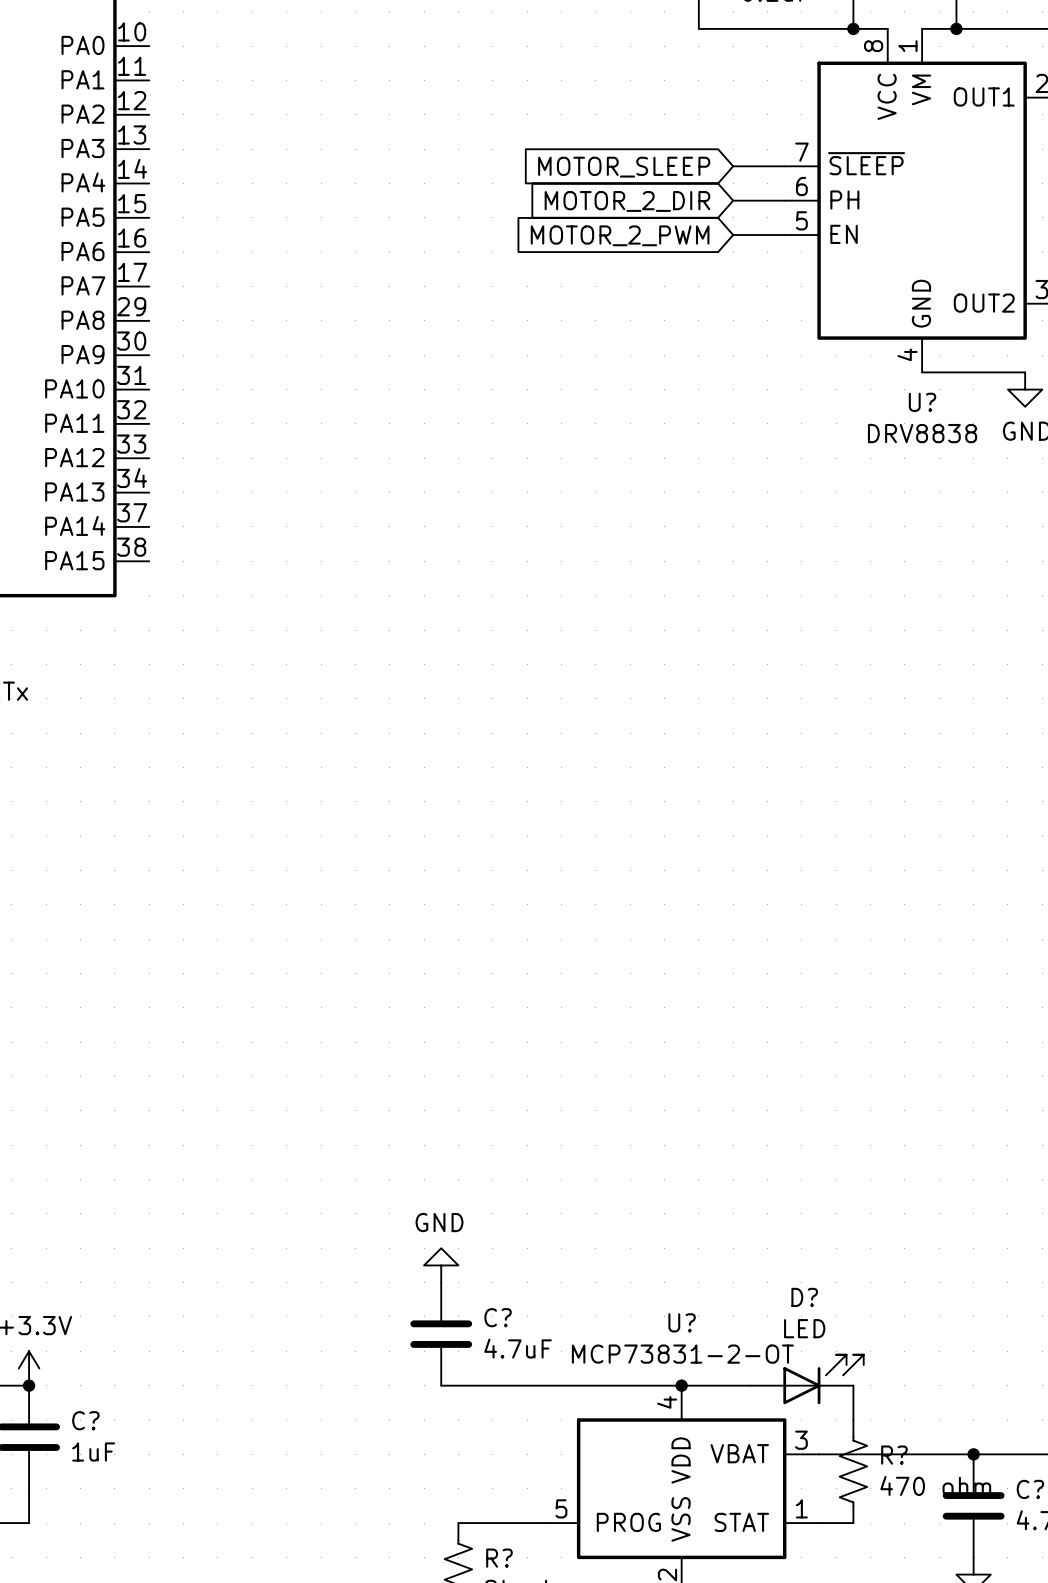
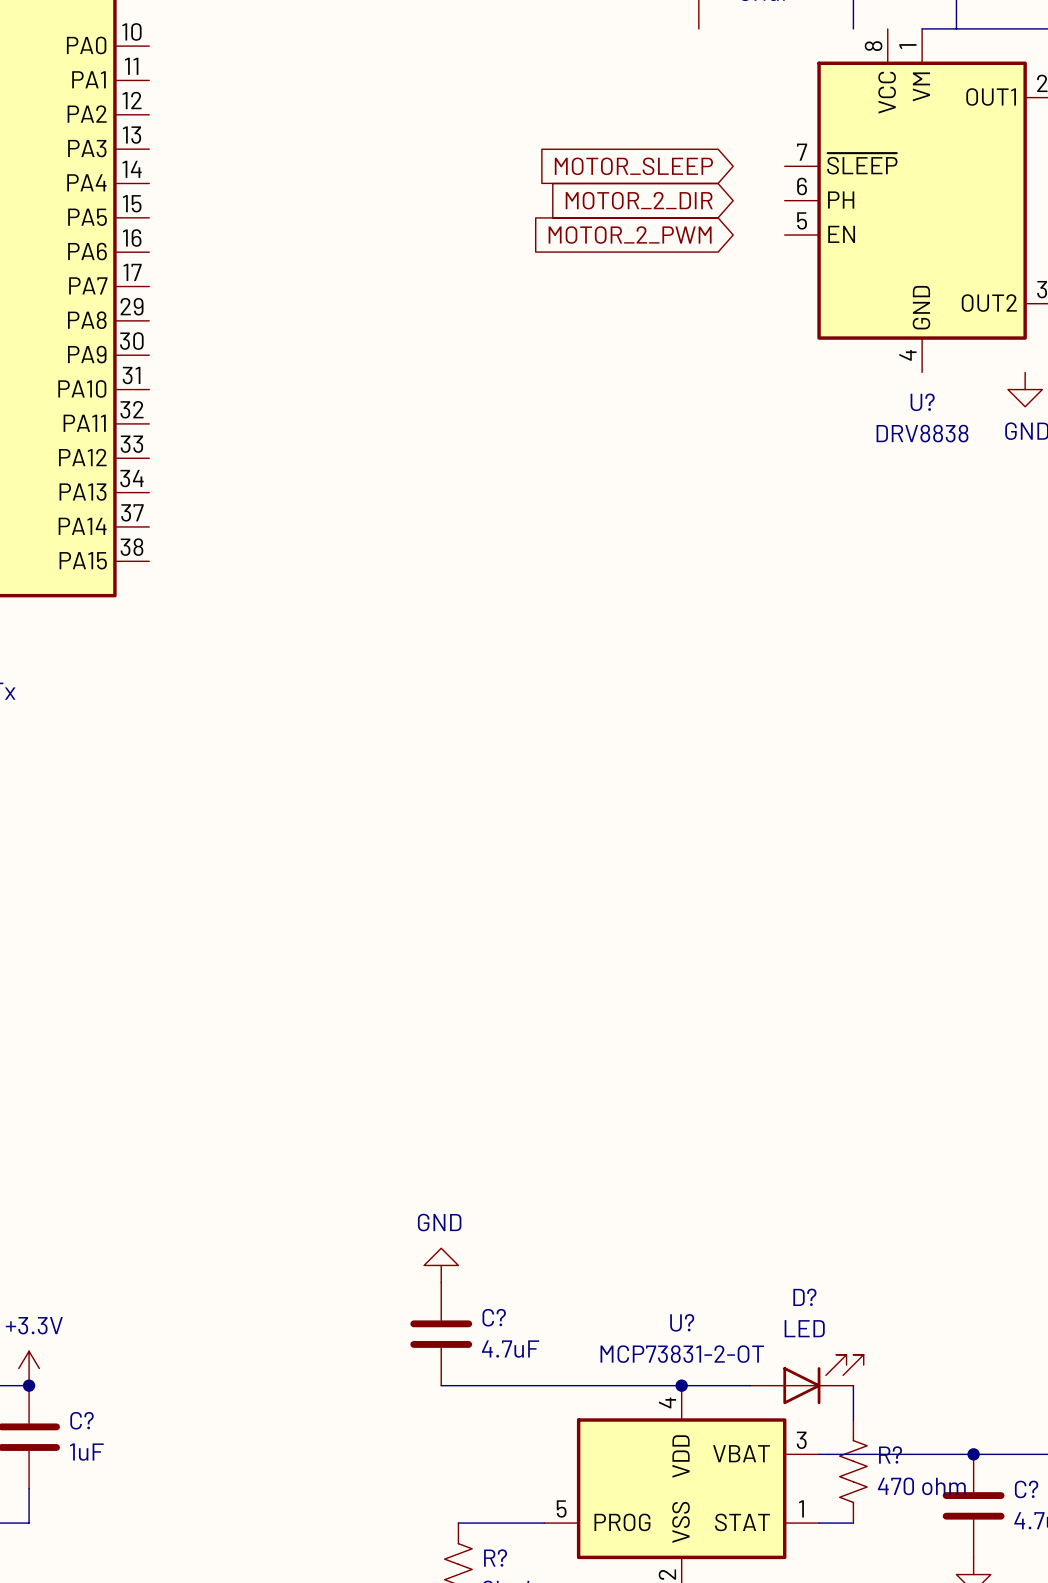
wire: (698, 28) (887, 28) -> none
junction: (853, 28) -> none
junction: (956, 28) -> none
wire: (733, 166) (784, 166) -> none
wire: (733, 200) (784, 200) -> none
wire: (733, 235) (784, 235) -> none
wire: (922, 372) (1025, 372) -> none

